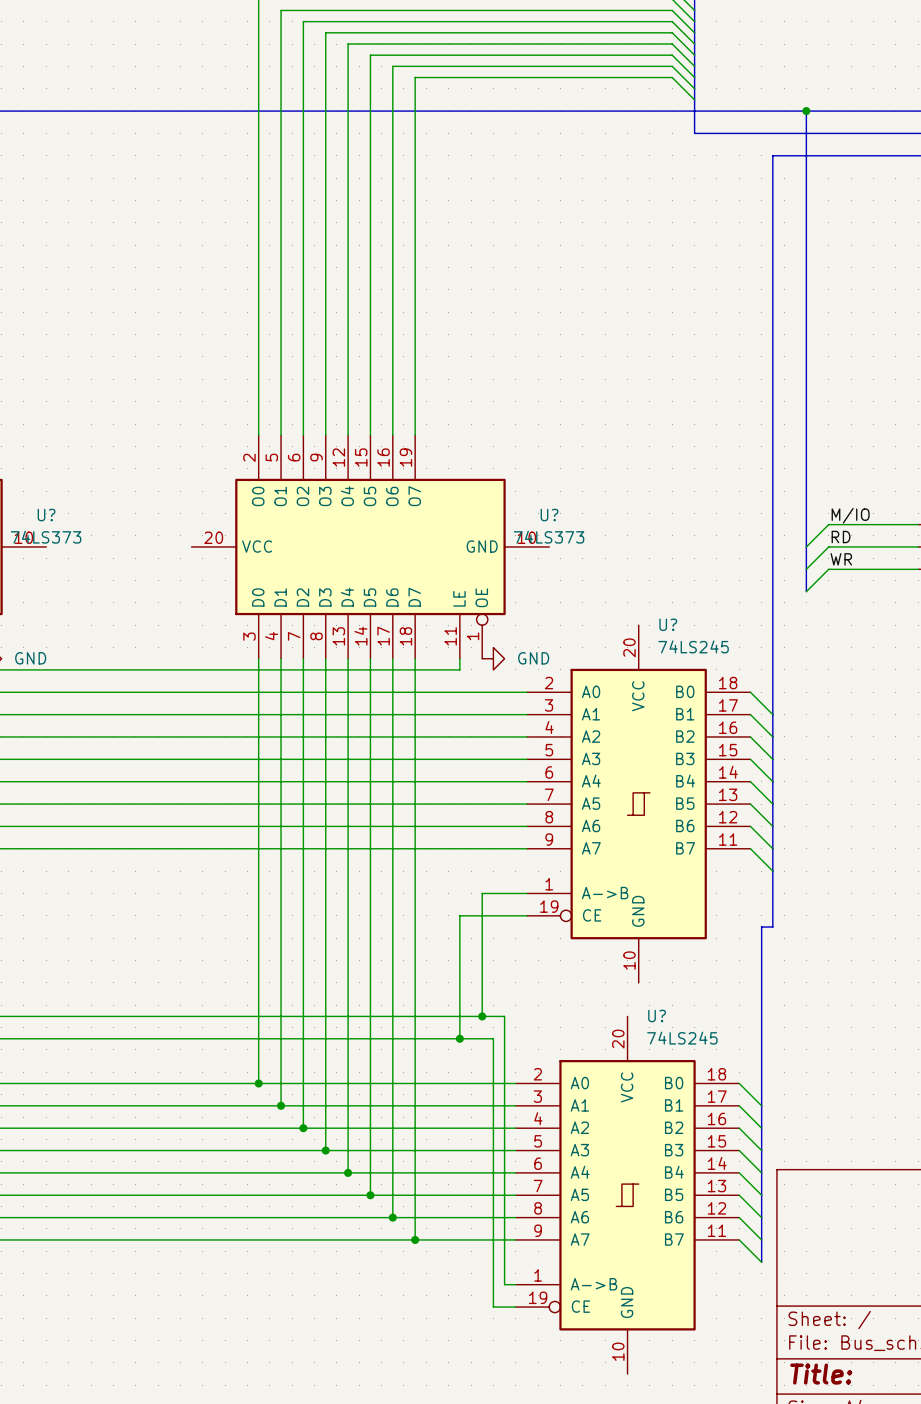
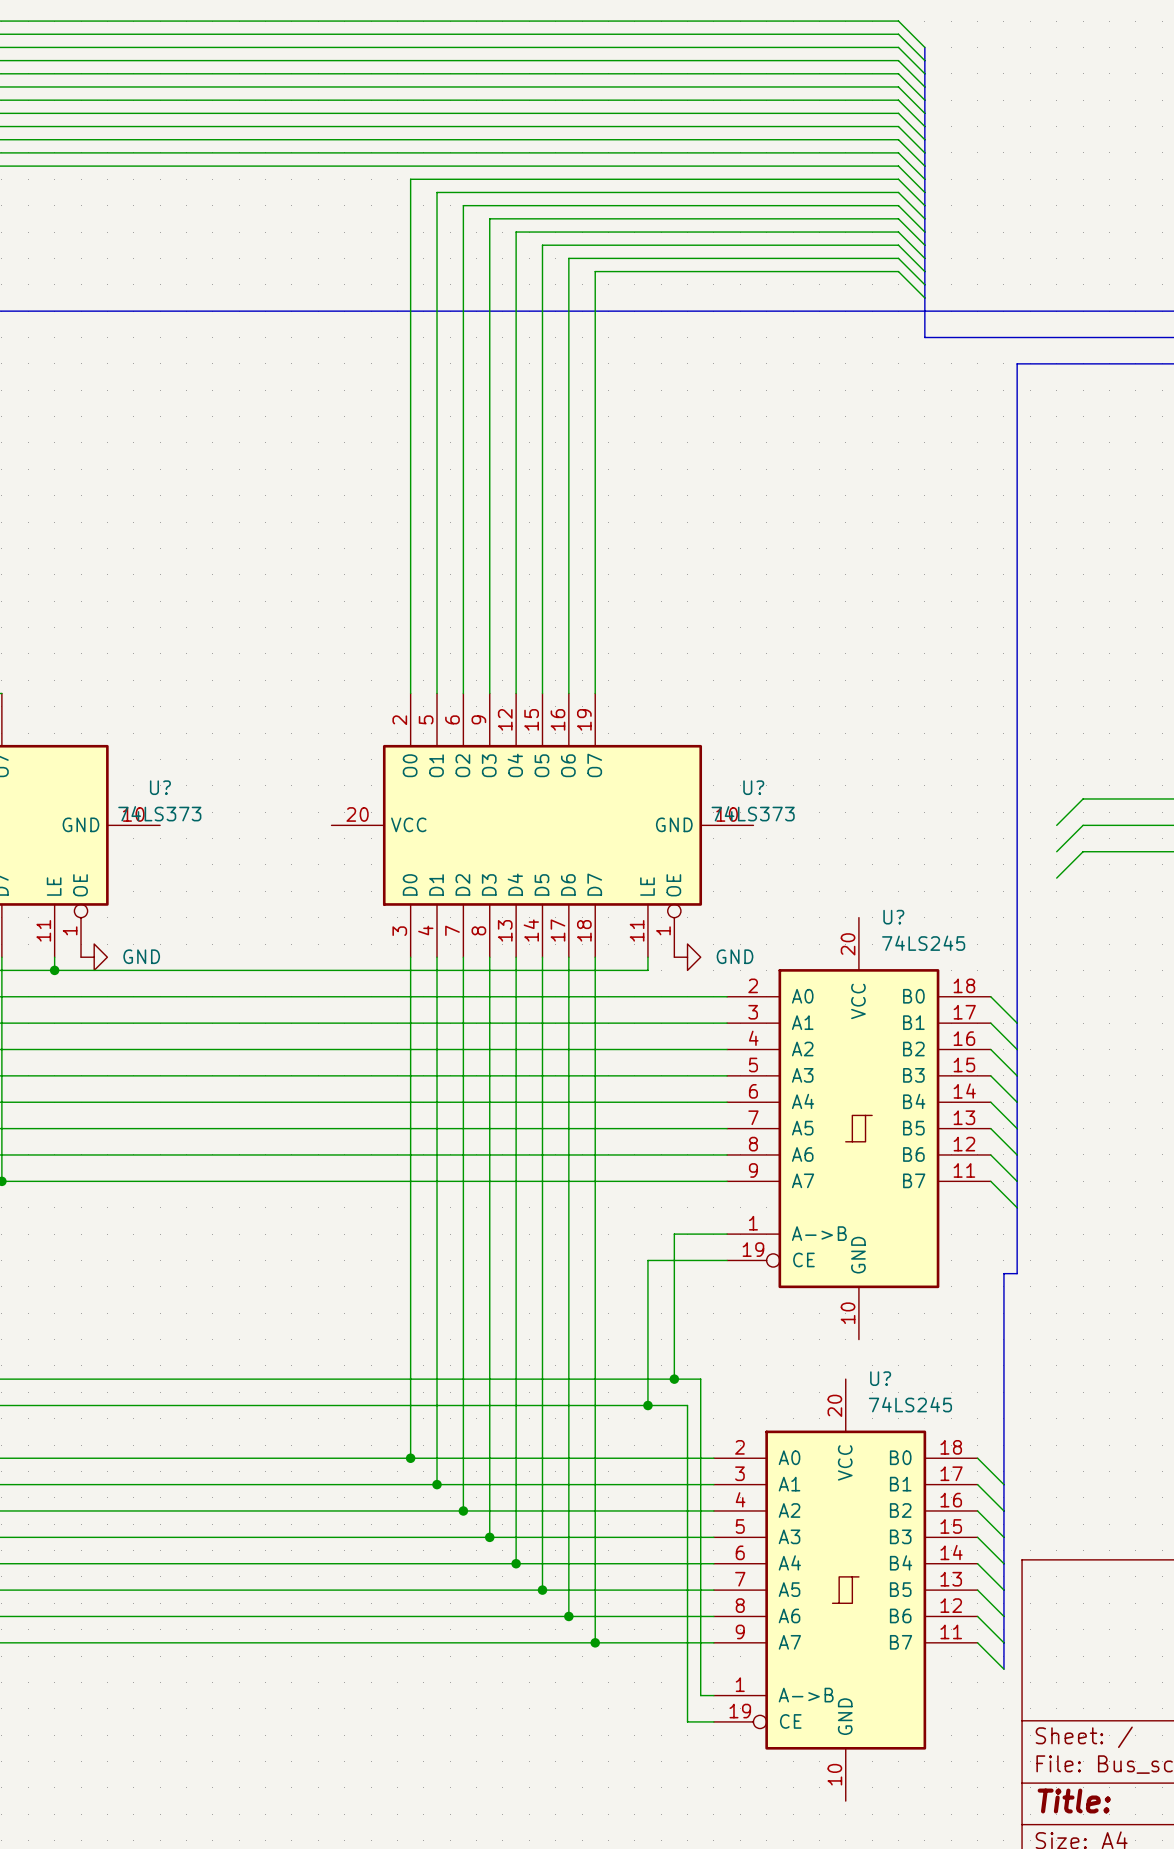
bus: (806, 111) (806, 591) -> none
junction: (806, 111) -> none
label: M/IO (850, 515) -> none
label: RD (841, 537) -> none
label: WR (841, 559) -> none

